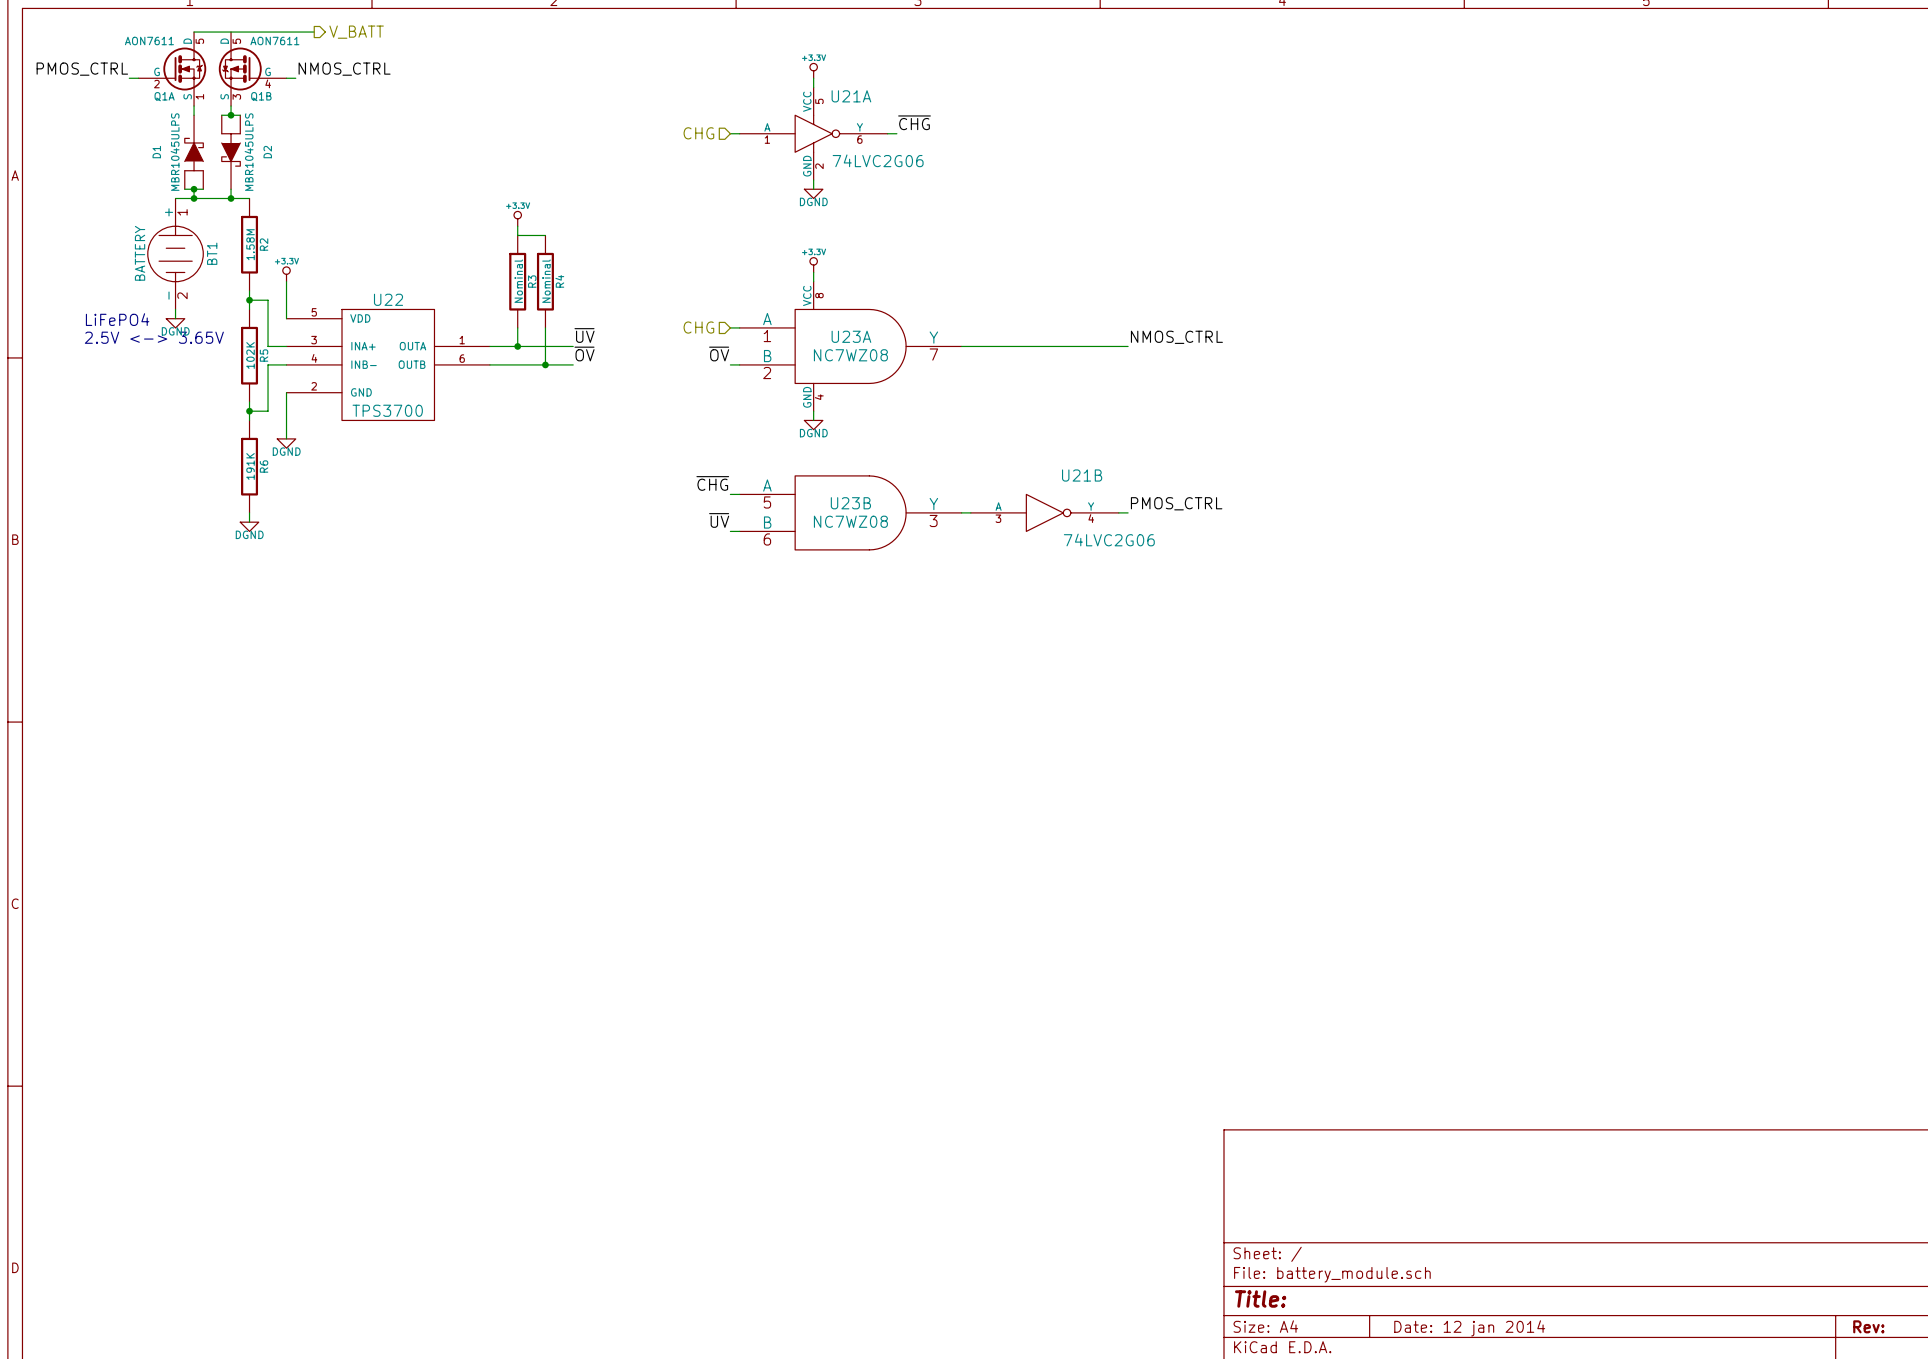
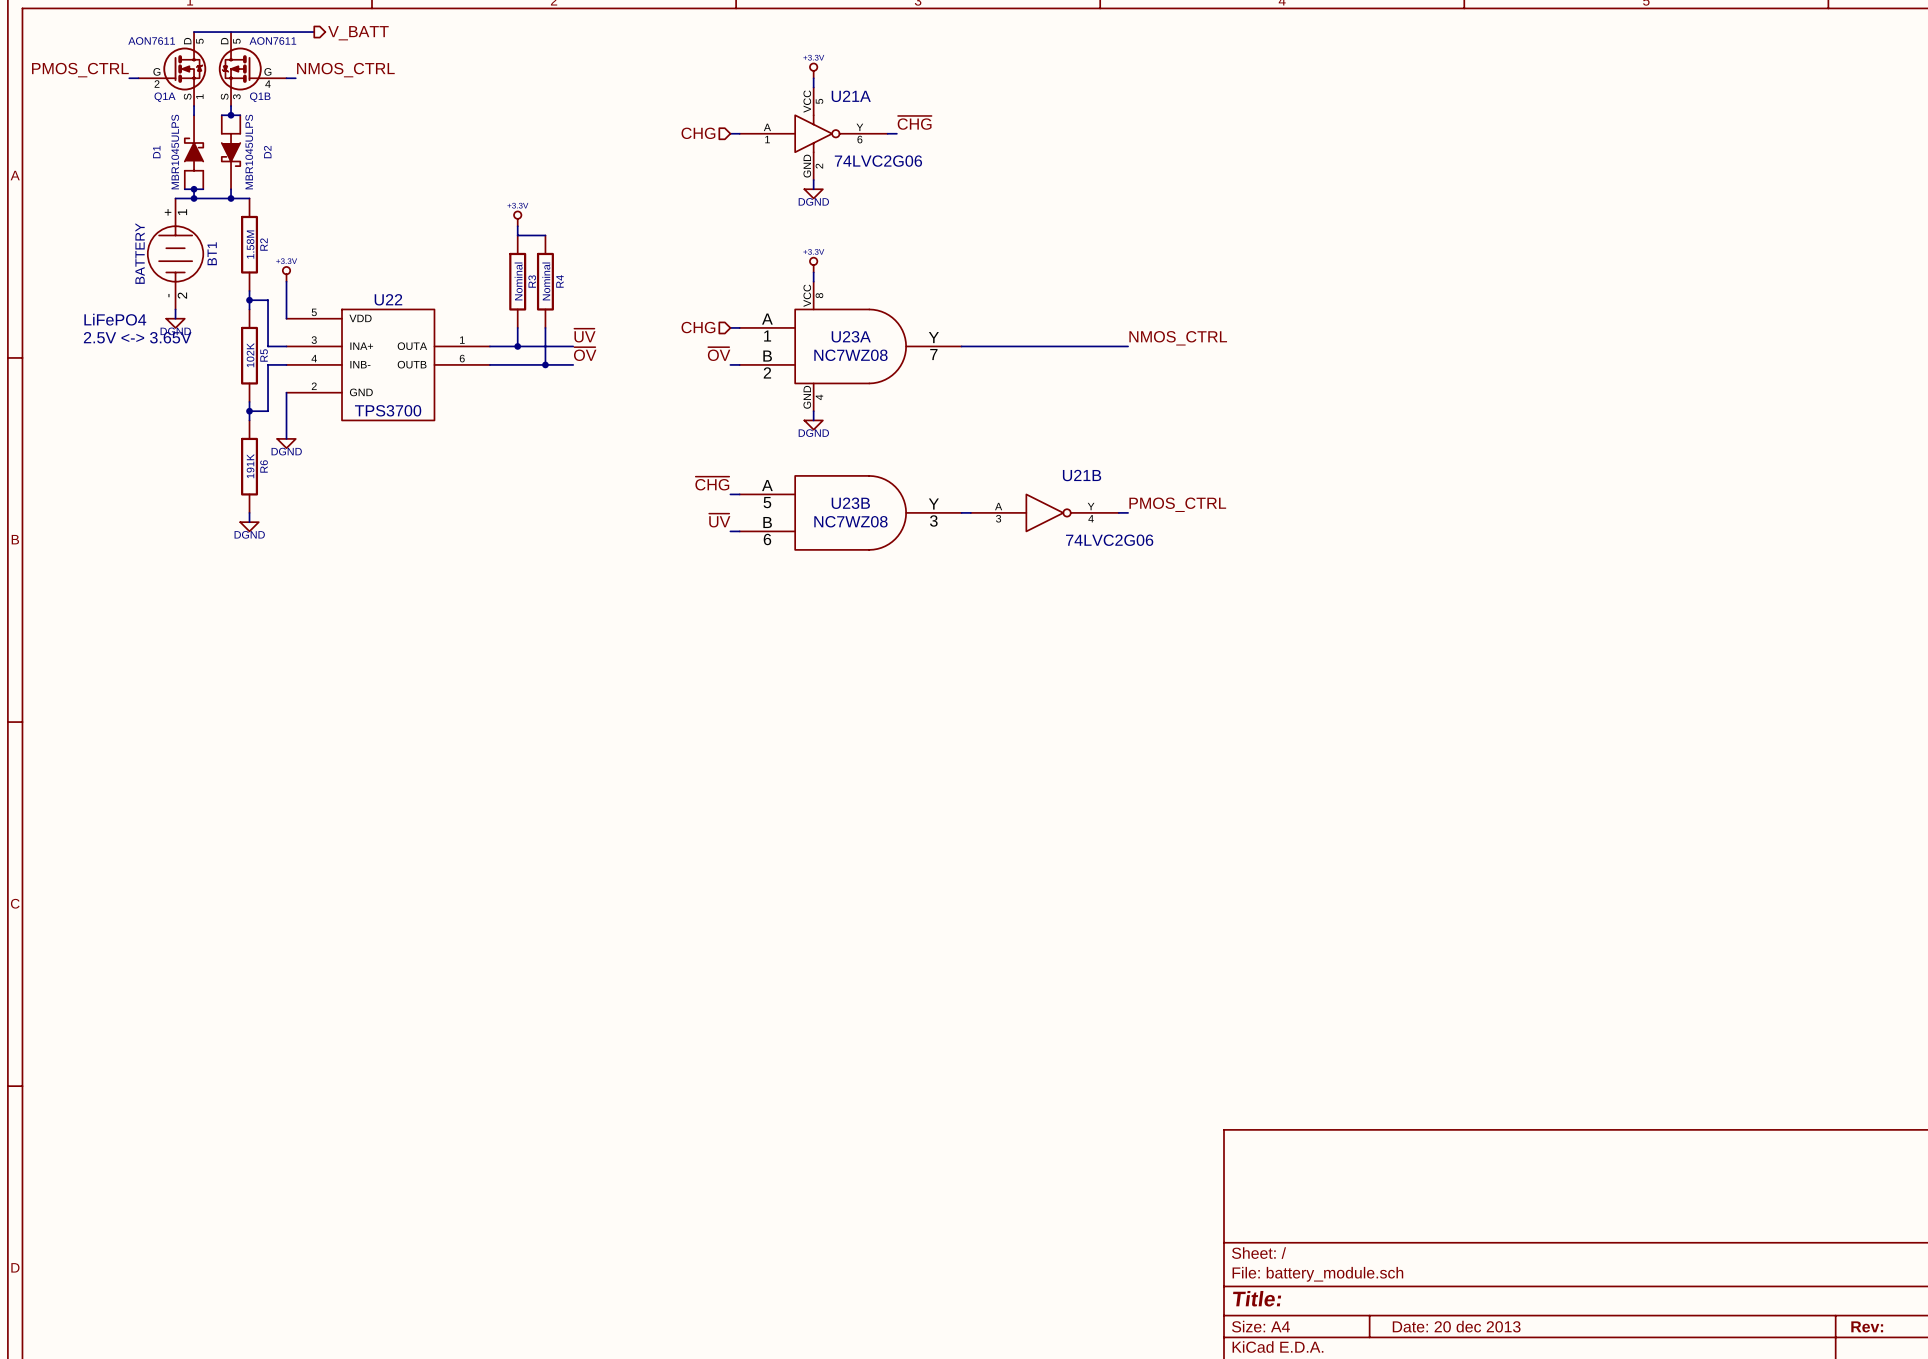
title block: Date: 12 jan 2014 (1469, 1328) -> Date: 20 dec 2013 (1456, 1326)

